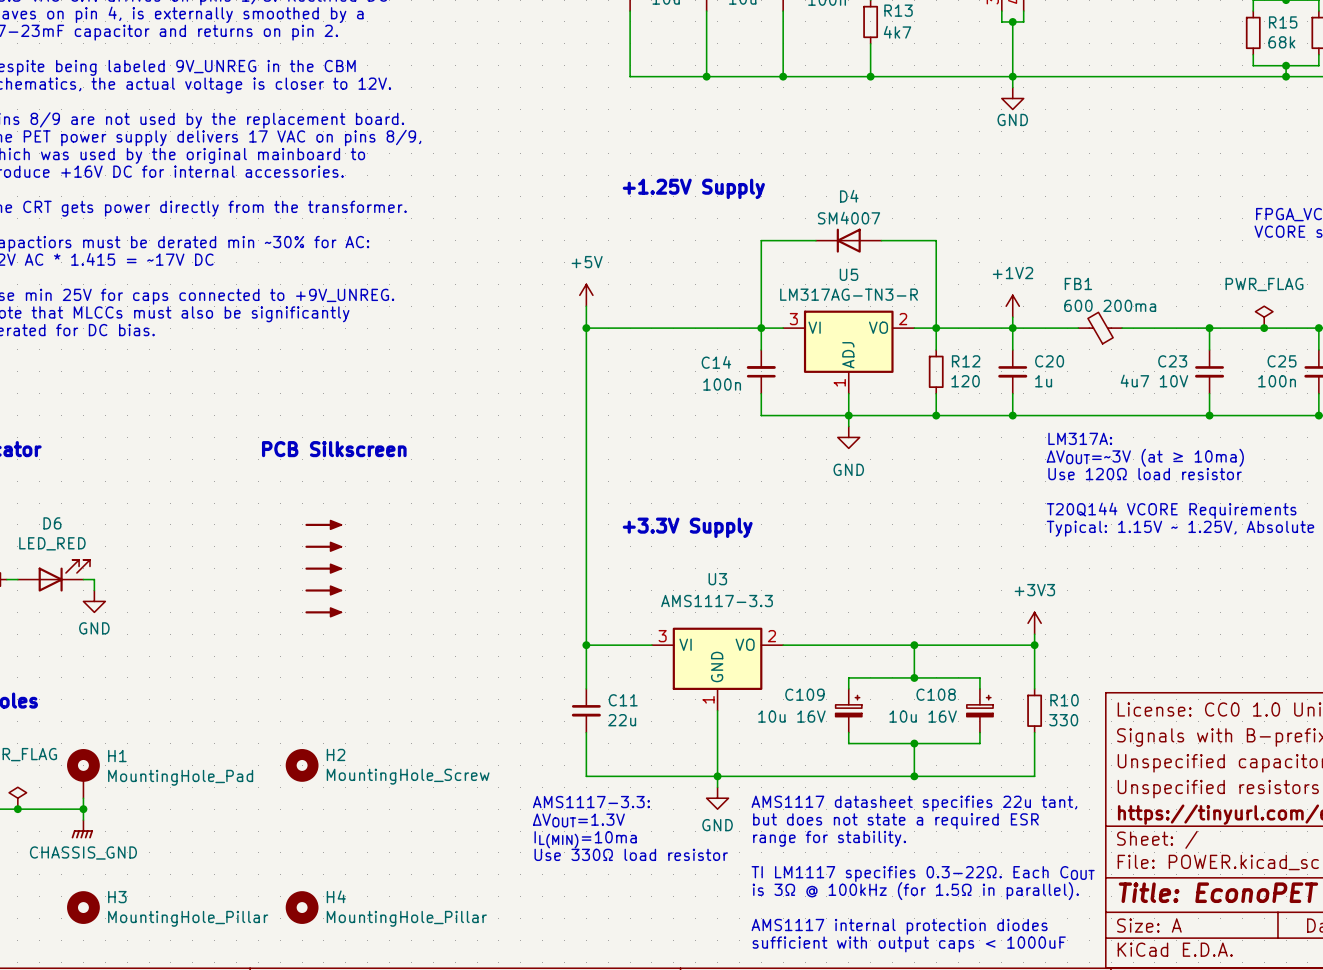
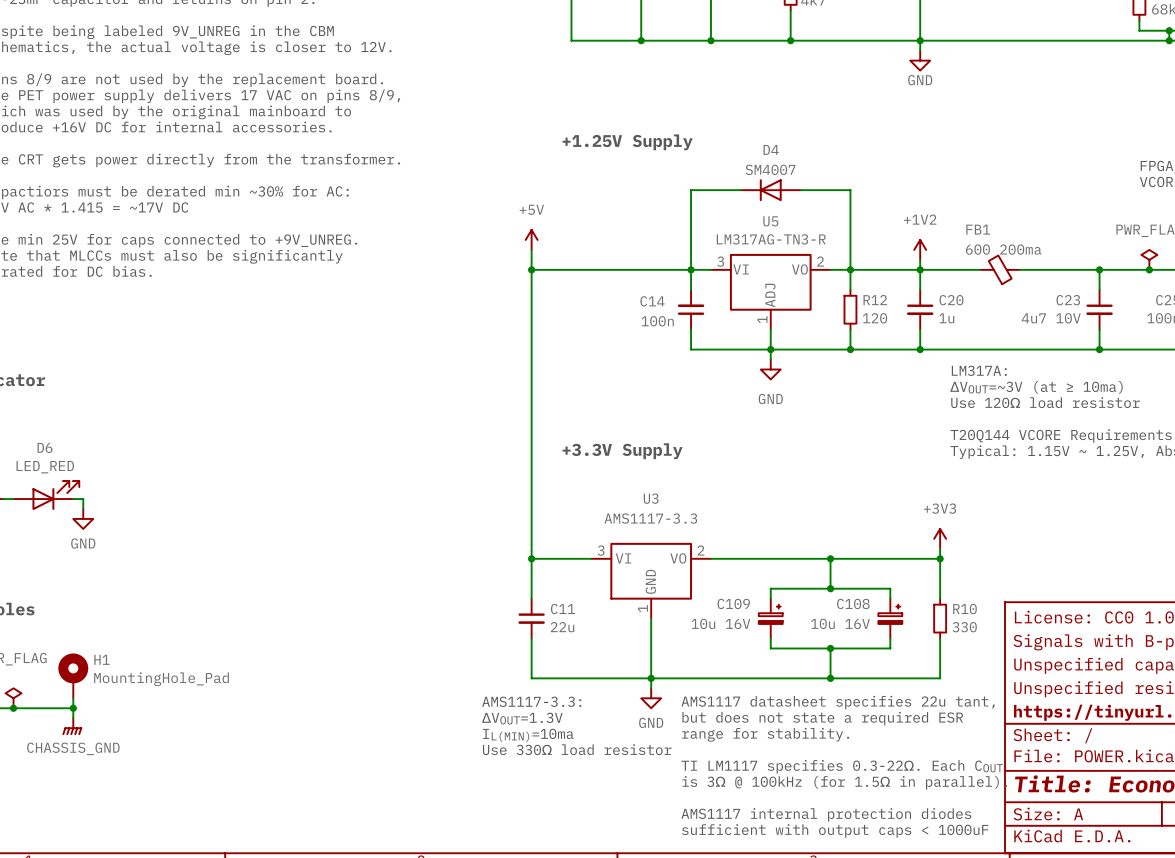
text: PCB Silkscreen (334, 449) -> none
part: (323, 524) -> none
part: (323, 546) -> none
part: (323, 568) -> none
part: (323, 590) -> none
part: (323, 612) -> none
H2: MountingHole_Screw (302, 765) -> none
H3: MountingHole_Pillar (83, 907) -> none
H4: MountingHole_Pillar (302, 907) -> none

